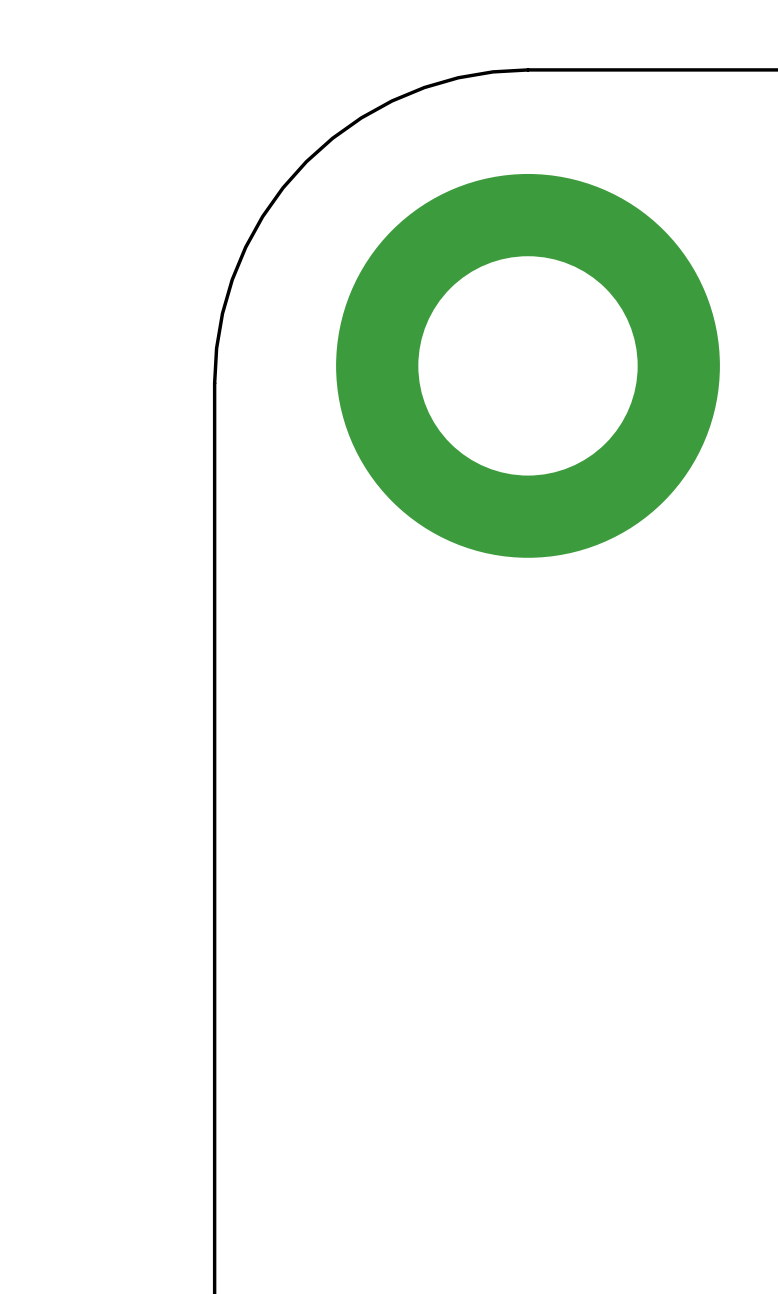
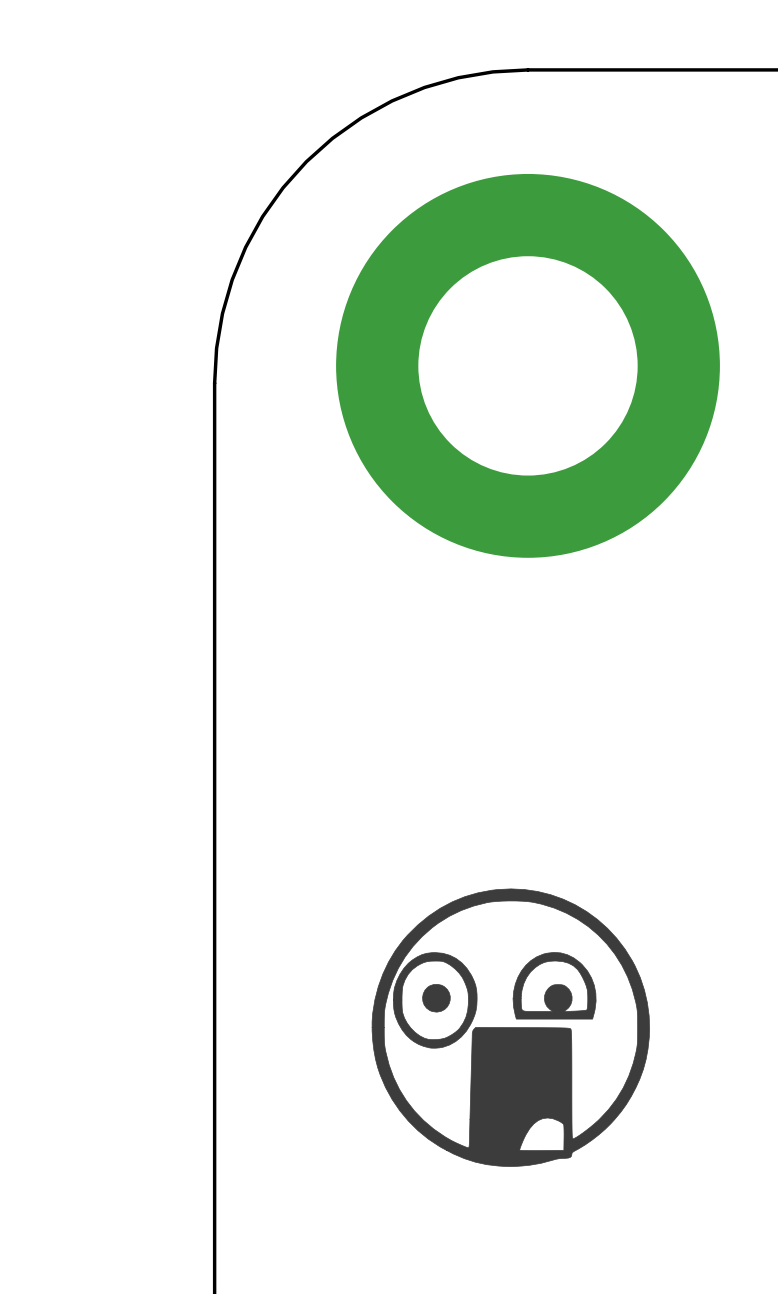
drawing: none -> [371, 888, 651, 1167]

